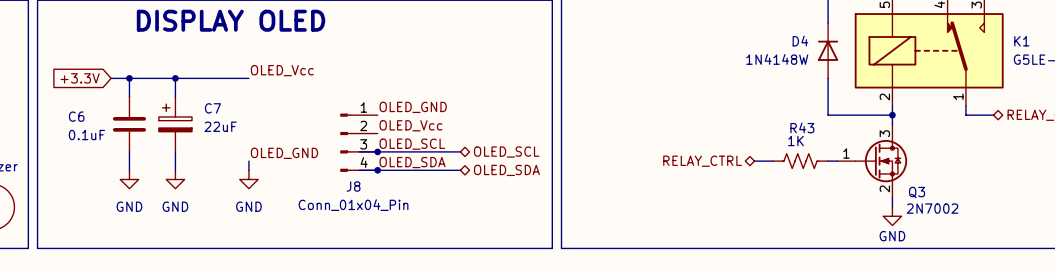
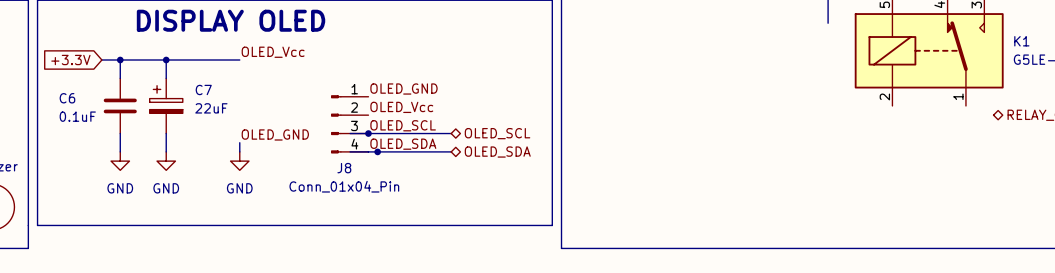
D4: 1N4148W (828, 50) -> none
junction: none -> (120, 60)
junction: none -> (166, 60)
label position: OLED_Vcc (282, 70) -> OLED_Vcc (273, 52)
global label position: +3.3V (80, 78) -> +3.3V (70, 60)
wire: (111, 78) (248, 78) -> (101, 60) (239, 60)
wire: (129, 78) (129, 96) -> (120, 60) (120, 78)
junction: (129, 78) -> none
wire: (175, 78) (175, 96) -> (166, 60) (166, 78)
junction: (175, 78) -> none
wire: (828, 78) (828, 115) (892, 115) -> none
wire: (892, 105) (892, 124) -> none
wire: (965, 105) (965, 115) (993, 115) -> none
label position: OLED_GND (413, 107) -> OLED_GND (403, 89)
junction: (892, 115) -> none
C6 position: (129, 124) -> (120, 105)
C7 position: (175, 124) -> (166, 105)
label position: OLED_Vcc (410, 125) -> OLED_Vcc (401, 107)
J8 position: (359, 142) -> (349, 124)
label position: OLED_SCL (412, 144) -> OLED_SCL (403, 125)
wire: (129, 151) (129, 170) -> (120, 133) (120, 151)
wire: (175, 151) (175, 170) -> (166, 133) (166, 151)
hierarchical label position: OLED_SCL (506, 152) -> OLED_SCL (497, 133)
label position: OLED_GND (284, 153) -> OLED_GND (275, 134)
power symbol: none -> GND (120, 161)
power symbol: none -> GND (166, 161)
wire: (248, 161) (248, 170) -> (239, 142) (239, 151)
hierarchical label: RELAY_CTRL (702, 161) -> none
wire: (754, 161) (772, 161) -> none
R43: 1K (800, 161) -> none
wire: (828, 161) (837, 161) -> none
Q3: 2N7002 (872, 161) -> none
label position: OLED_SDA (412, 162) -> OLED_SDA (403, 144)
wire: (359, 170) (460, 170) -> (350, 133) (451, 133)
junction position: (377, 170) -> (368, 133)
hierarchical label position: OLED_SDA (506, 170) -> OLED_SDA (497, 152)
power symbol: GND (129, 179) -> none
power symbol: GND (175, 179) -> none
power symbol position: GND (248, 179) -> GND (239, 161)
wire: (892, 197) (892, 207) -> none
power symbol: GND (892, 216) -> none
line: (37, 225) (37, 248) (552, 248) (552, 225) -> (37, 225) (552, 225)

